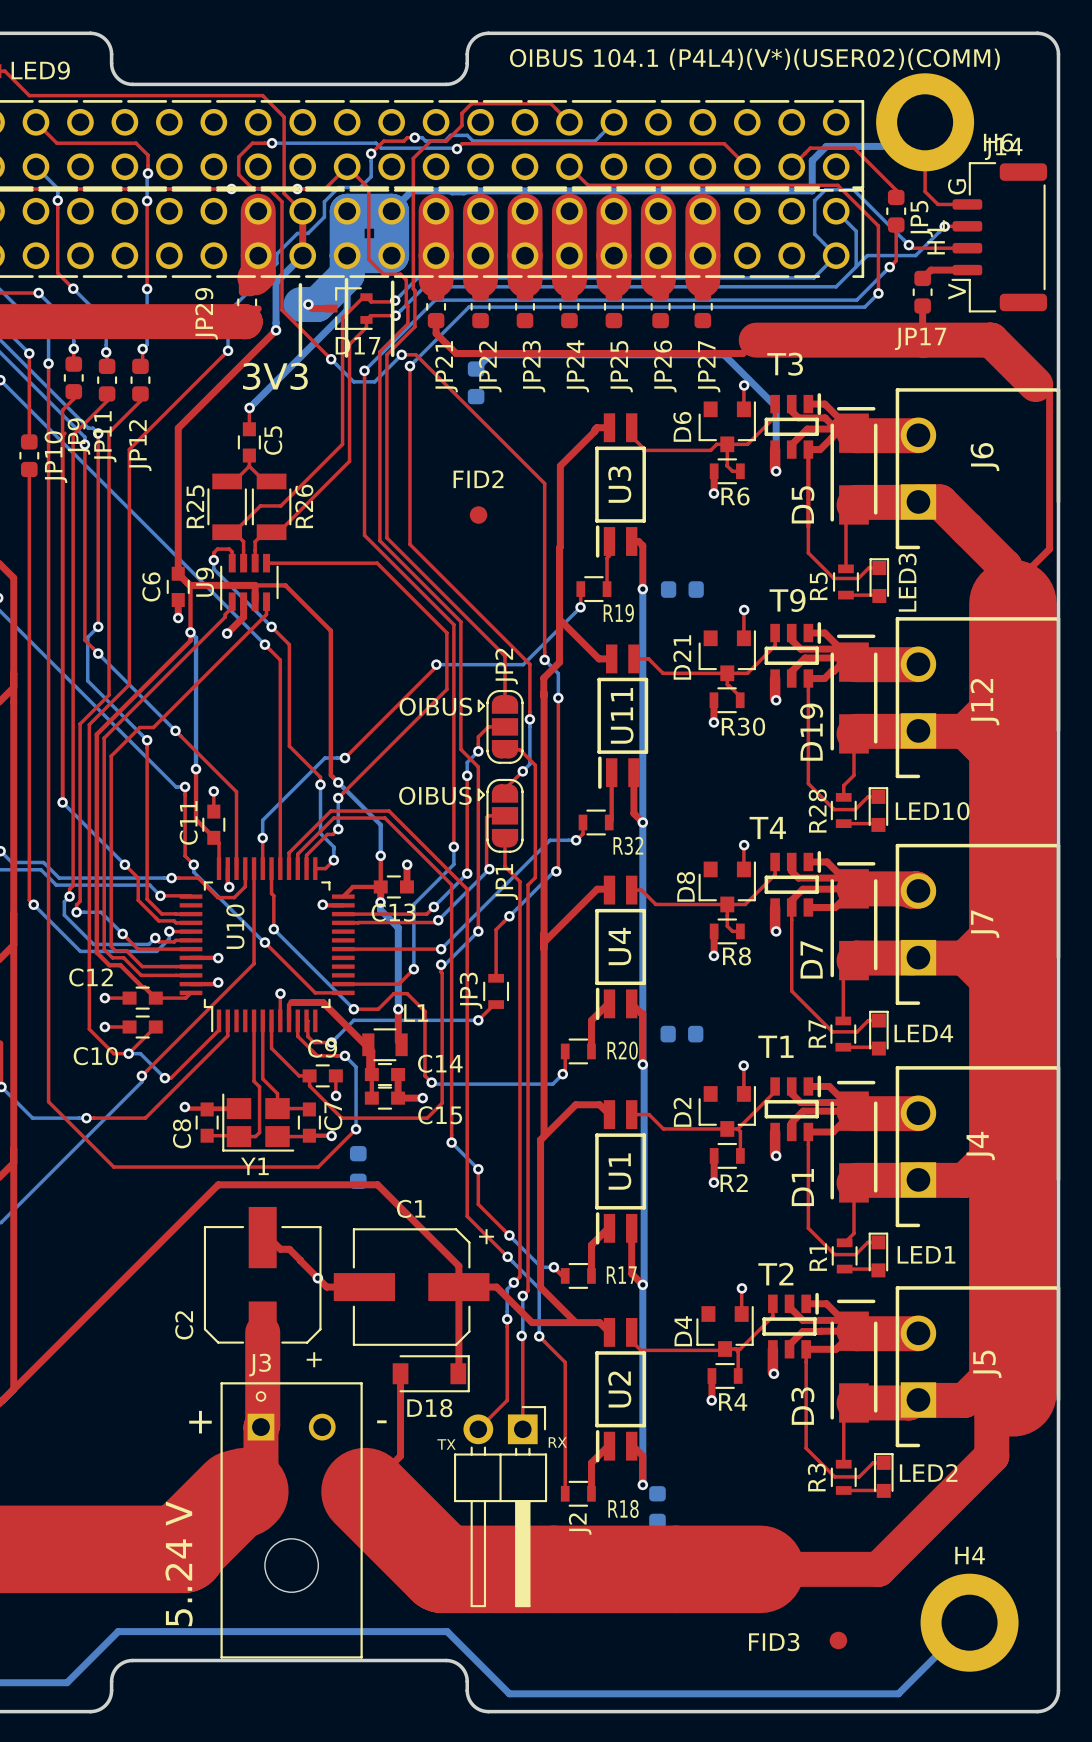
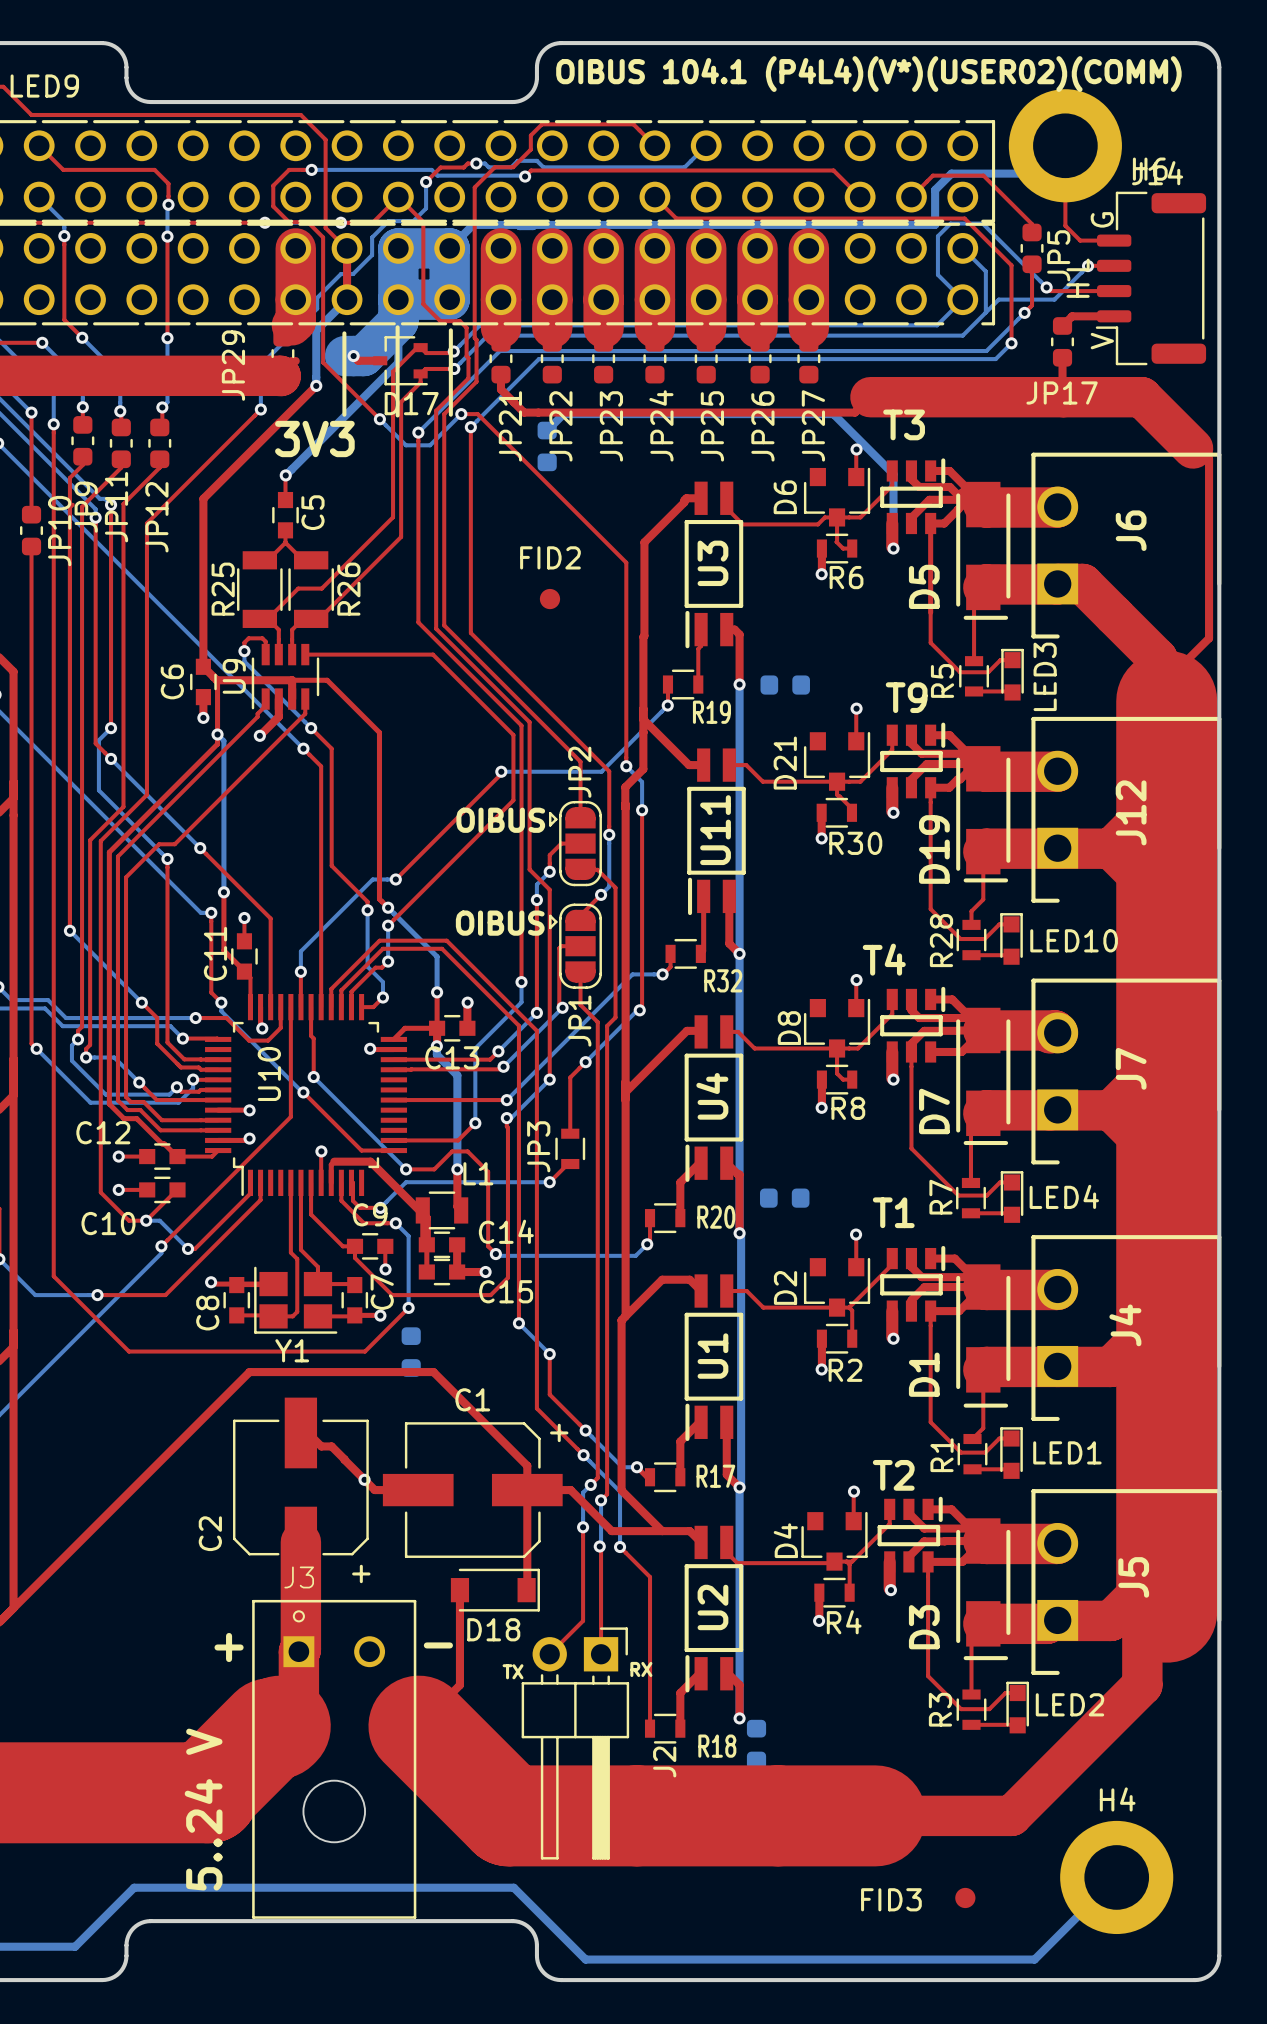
line: (838, 408) (873, 408) -> (965, 880) (1006, 880)
line: none -> (965, 617) (1006, 617)
line: (838, 636) (873, 636) -> (965, 1143) (1006, 1143)
line: (838, 863) (873, 863) -> (965, 1405) (1006, 1405)
line: (838, 1082) (873, 1082) -> (965, 1658) (1006, 1658)
line: (838, 1301) (873, 1301) -> none

